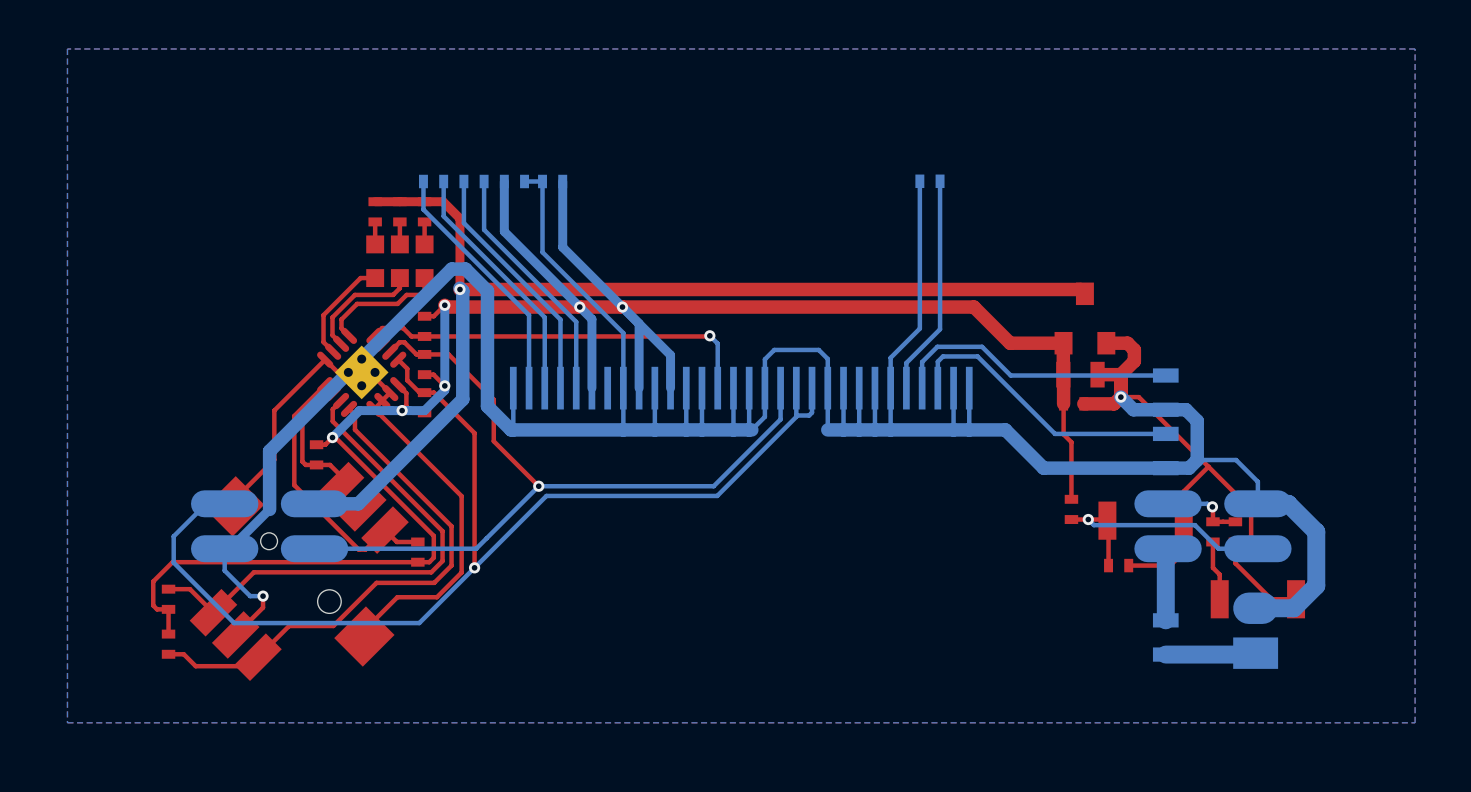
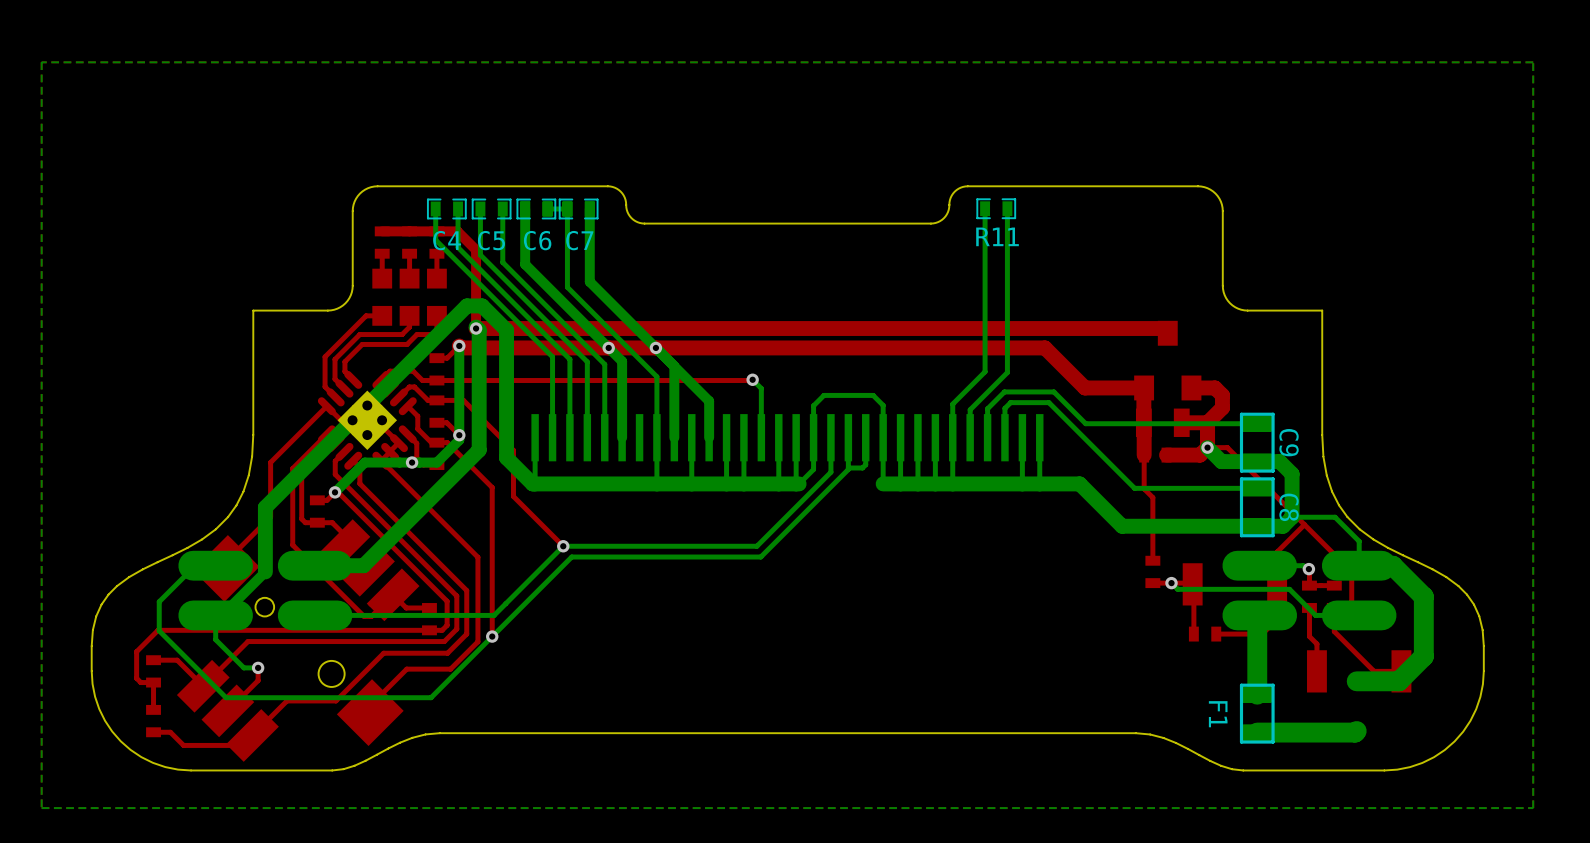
board edge: none -> (1197, 186) (965, 186) (953, 193) (947, 212) (943, 218) (930, 223) (644, 223) (631, 218) (627, 212) (622, 193) (610, 186) (377, 186) (368, 188) (357, 195) (352, 207) (352, 289) (345, 303) (331, 310) (253, 310) (252, 456) (248, 475) (236, 505) (215, 529) (202, 539) (129, 577) (116, 586) (101, 604) (92, 630) (91, 646) (92, 684) (99, 709) (105, 720) (120, 741) (141, 757) (165, 767) (190, 770) (343, 769) (412, 737) (439, 733) (1135, 733) (1163, 737) (1221, 765) (1243, 770) (1384, 770) (1410, 767) (1422, 762) (1434, 757) (1454, 741) (1470, 720) (1476, 709) (1482, 684) (1483, 671) (1482, 630) (1479, 616) (1474, 604) (1458, 586) (1432, 569) (1373, 539) (1359, 529) (1339, 505) (1326, 475) (1323, 456) (1322, 310) (1244, 310) (1230, 303) (1223, 288) (1221, 204) (1213, 191) (1197, 186)
part: (433, 181) -> none
C4: none -> (446, 208)
part: (474, 181) -> none
C5: none -> (491, 208)
C6: none -> (536, 208)
C7: none -> (578, 208)
part: (929, 181) -> none
R11: none -> (996, 208)
C9: none -> (1257, 442)
C8: none -> (1257, 507)
part: (1255, 630) -> none
F1: none -> (1257, 713)

